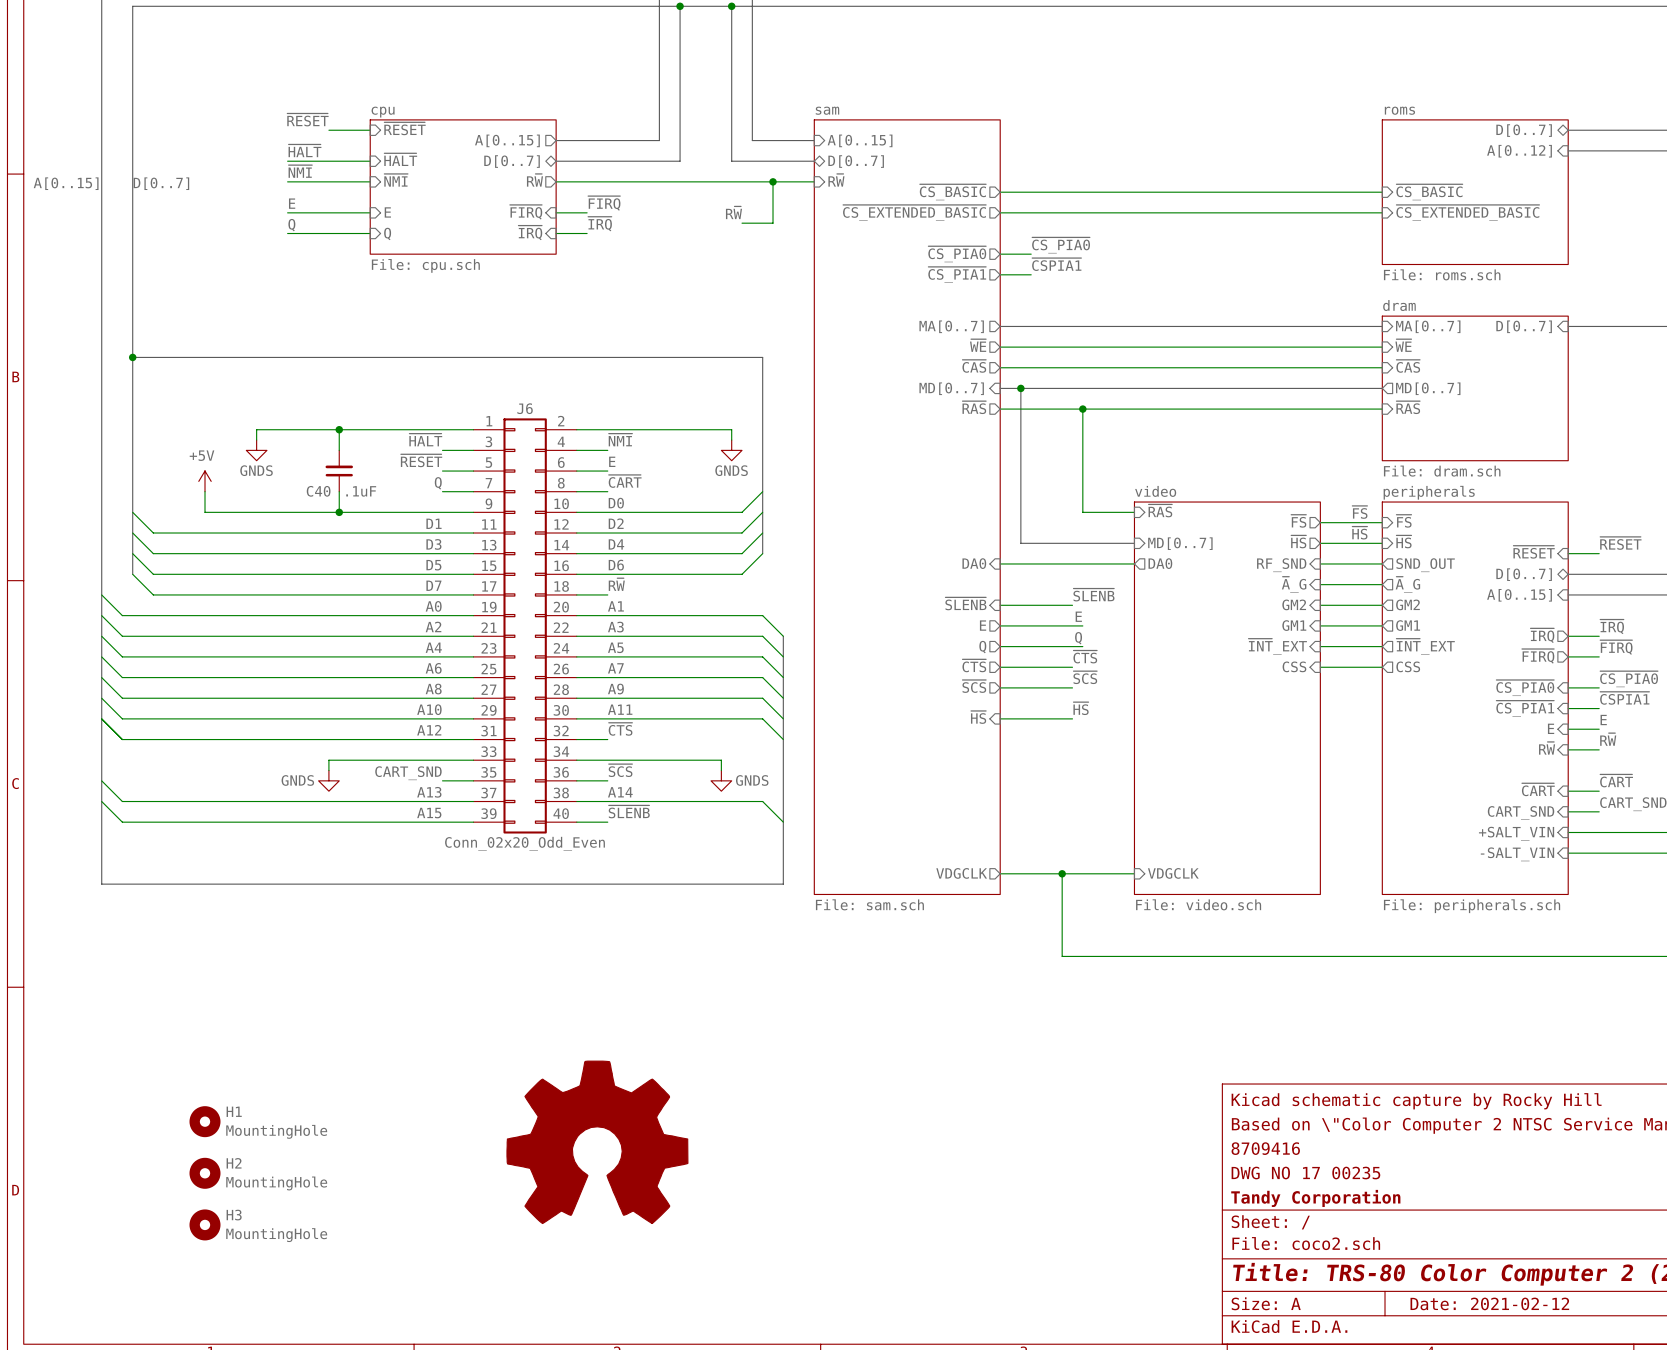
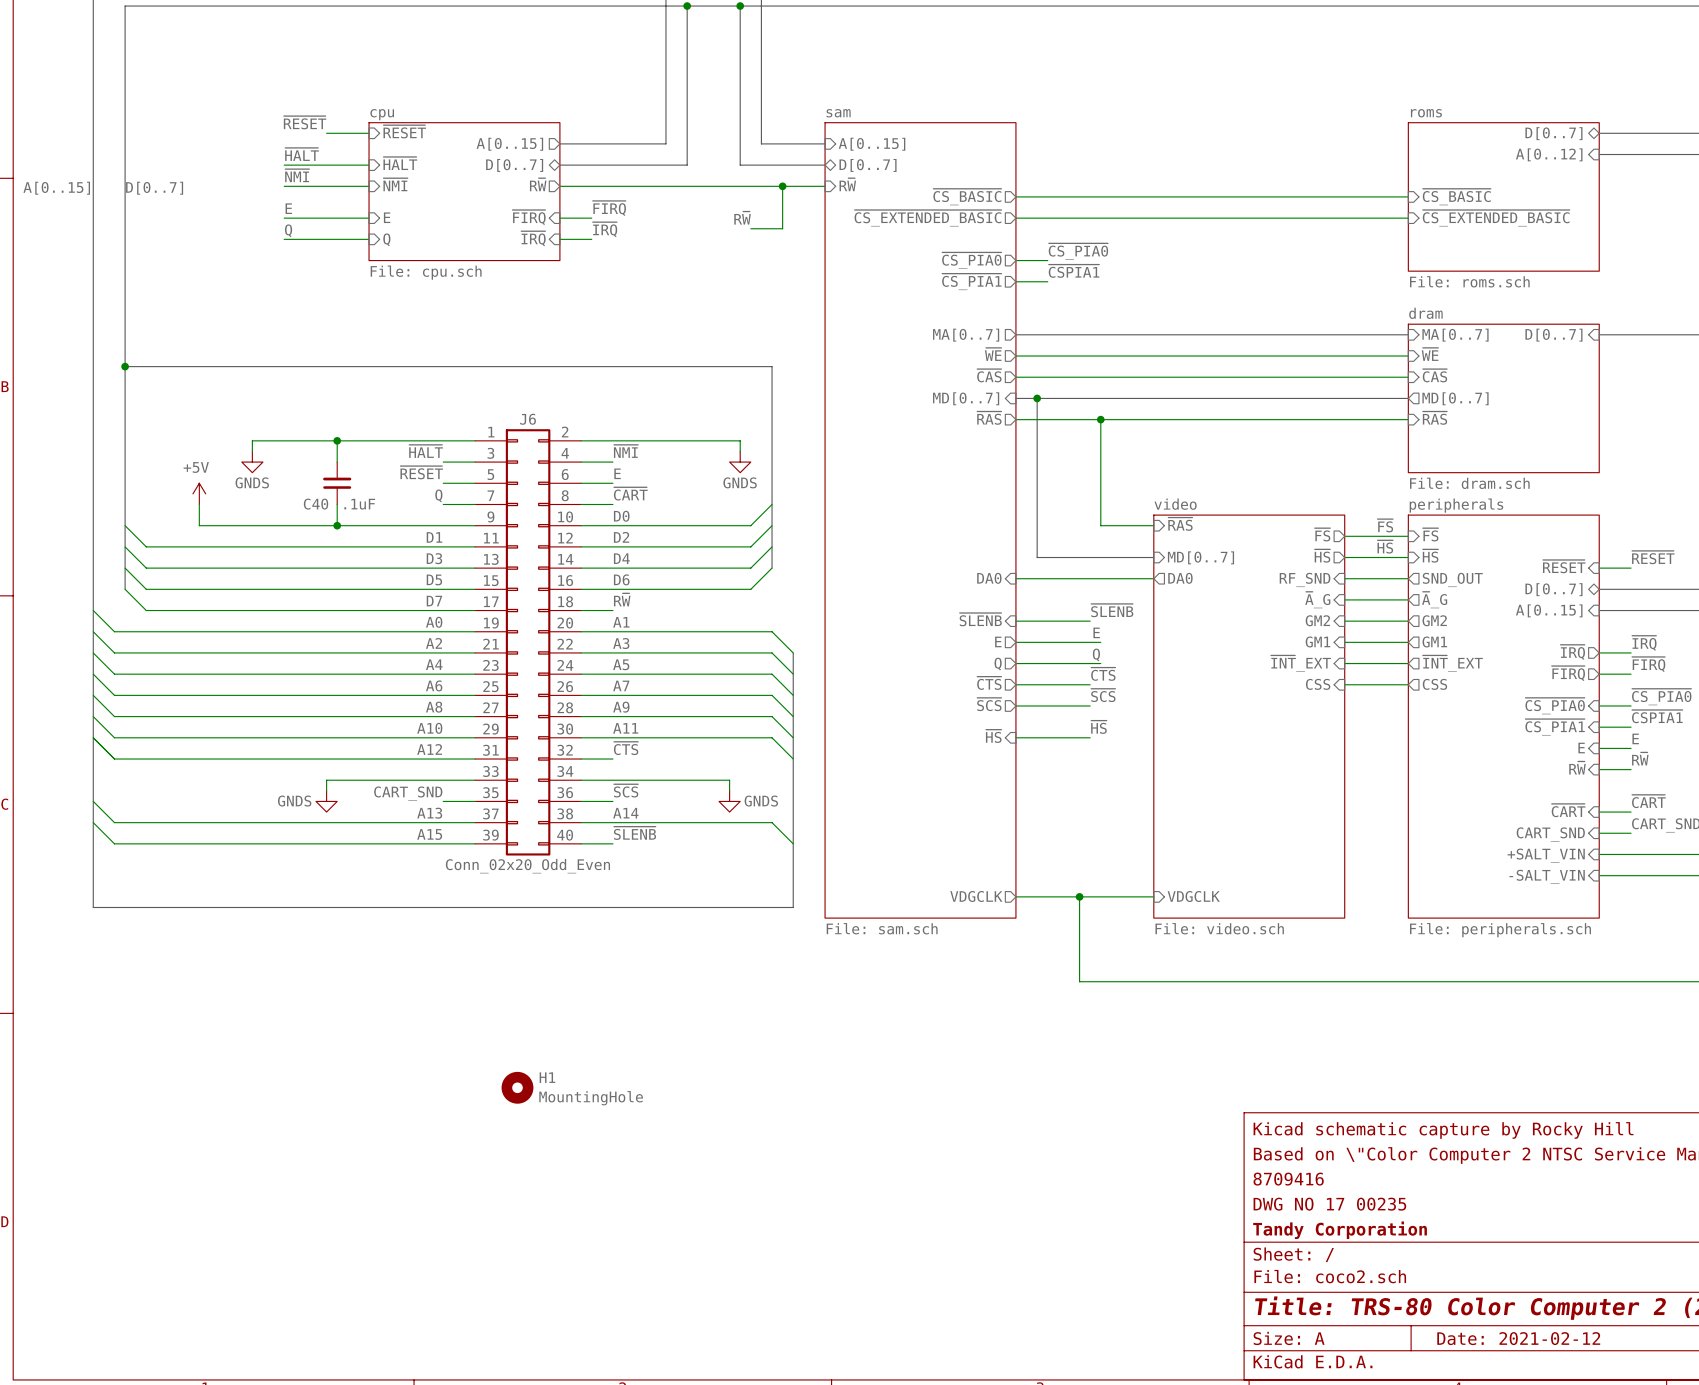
H1 position: (205, 1121) -> (517, 1087)
power symbol: (597, 1142) -> none
H2: MountingHole (205, 1173) -> none
H3: MountingHole (205, 1224) -> none

